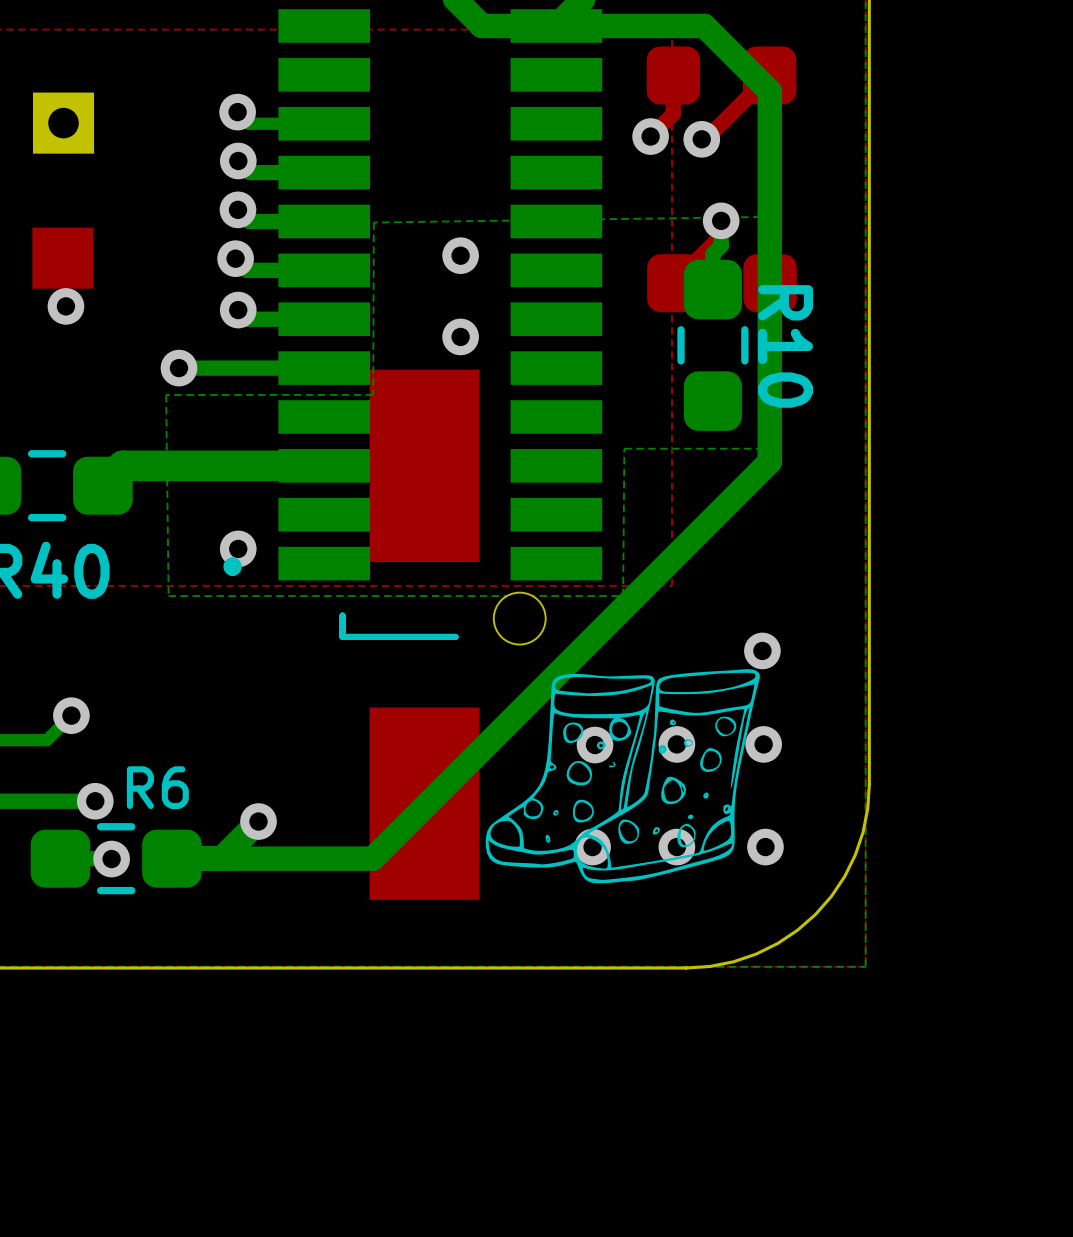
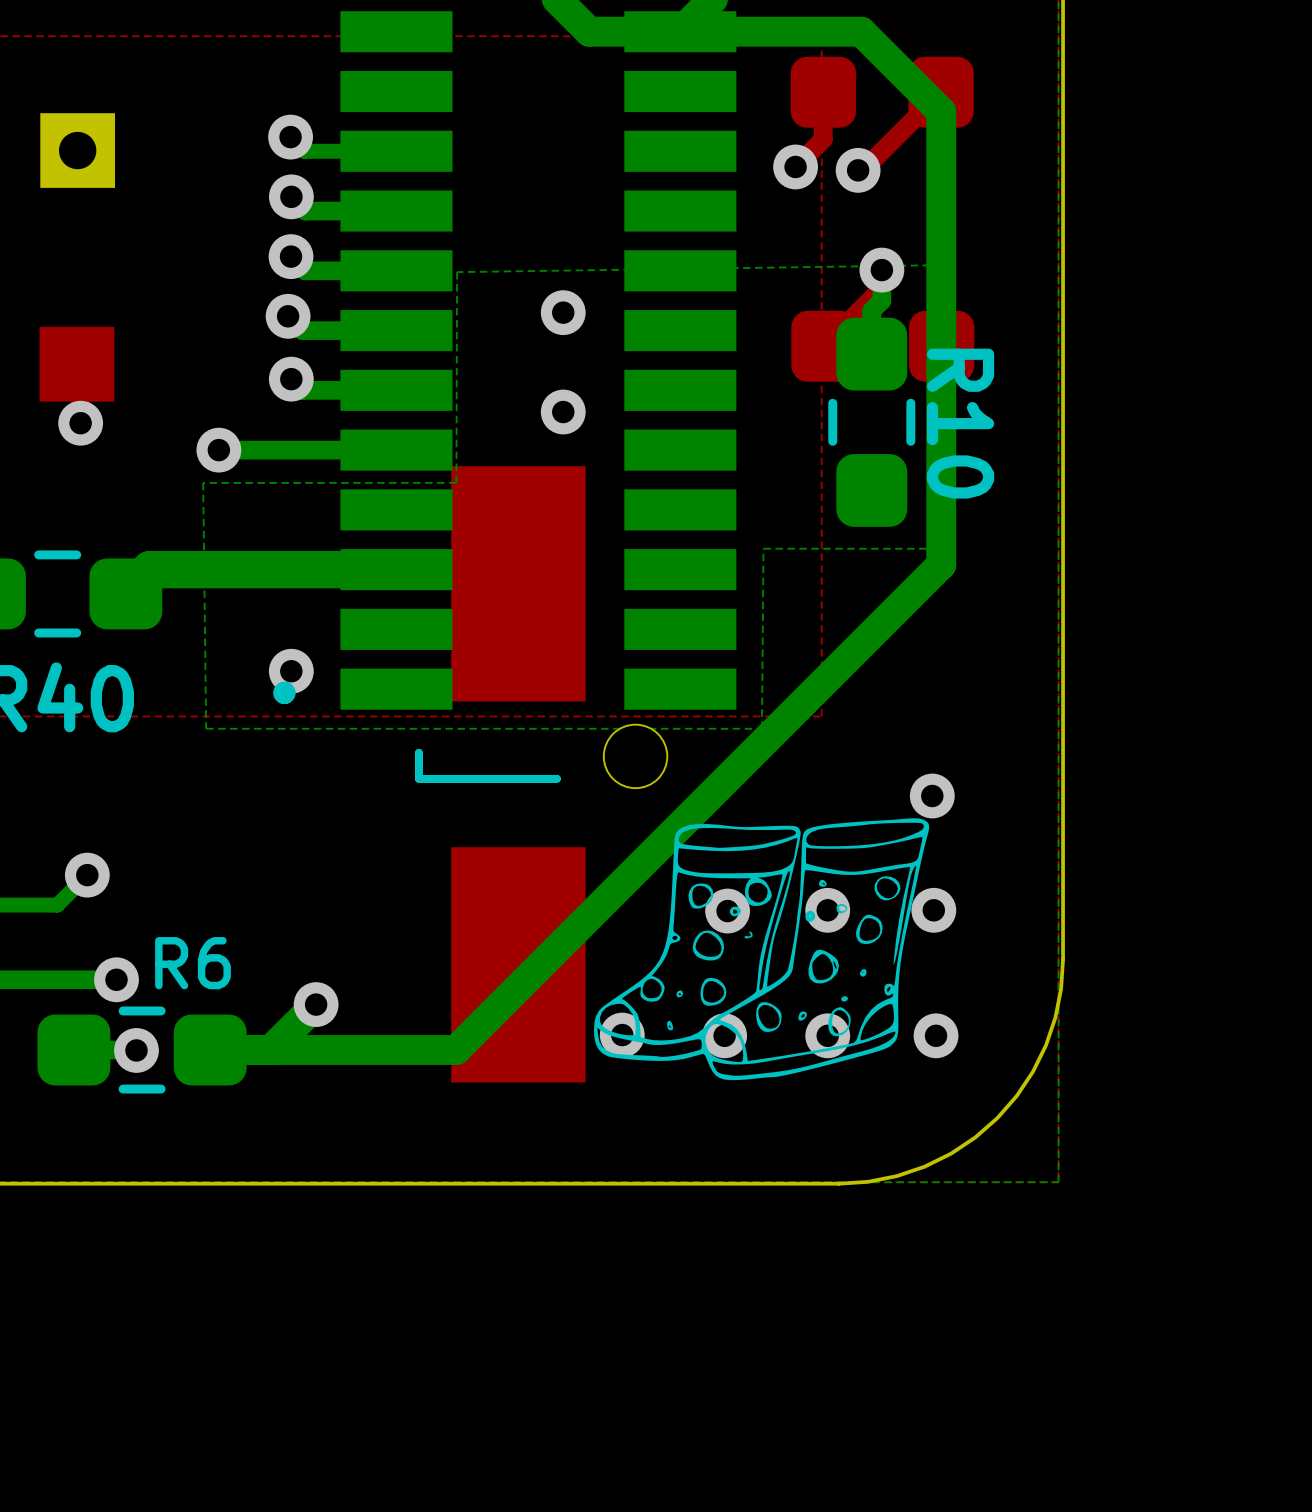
part position: (62, 258) -> (76, 364)
via position: (65, 306) -> (80, 423)
part footprint: [369, 369, 480, 900] -> [451, 466, 586, 1083]
via: none -> (622, 1035)

